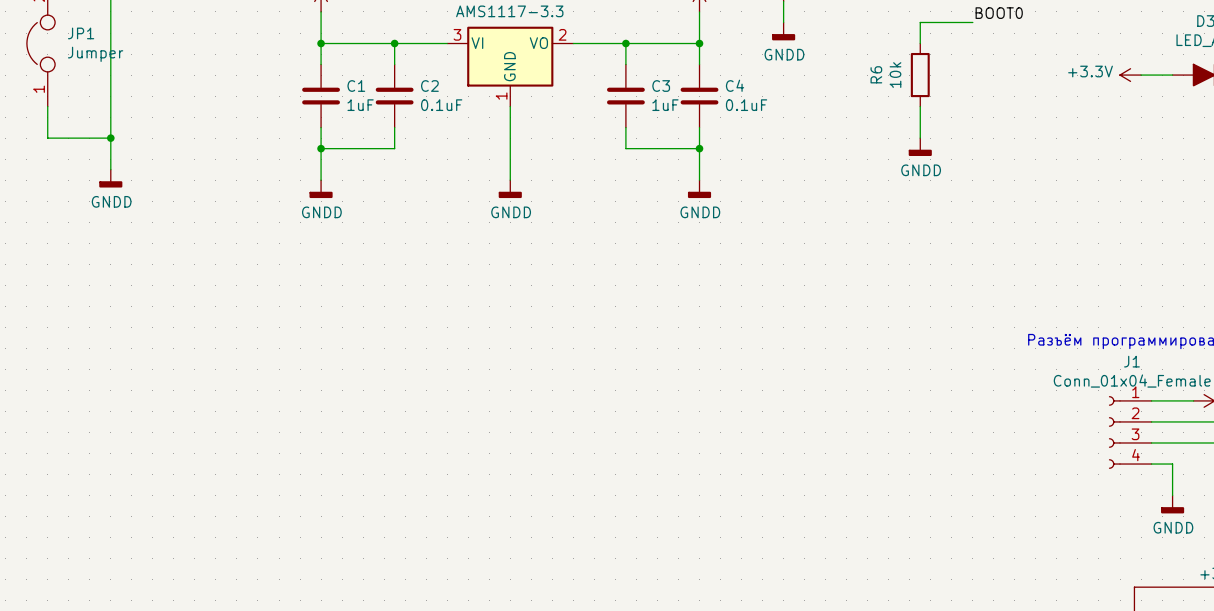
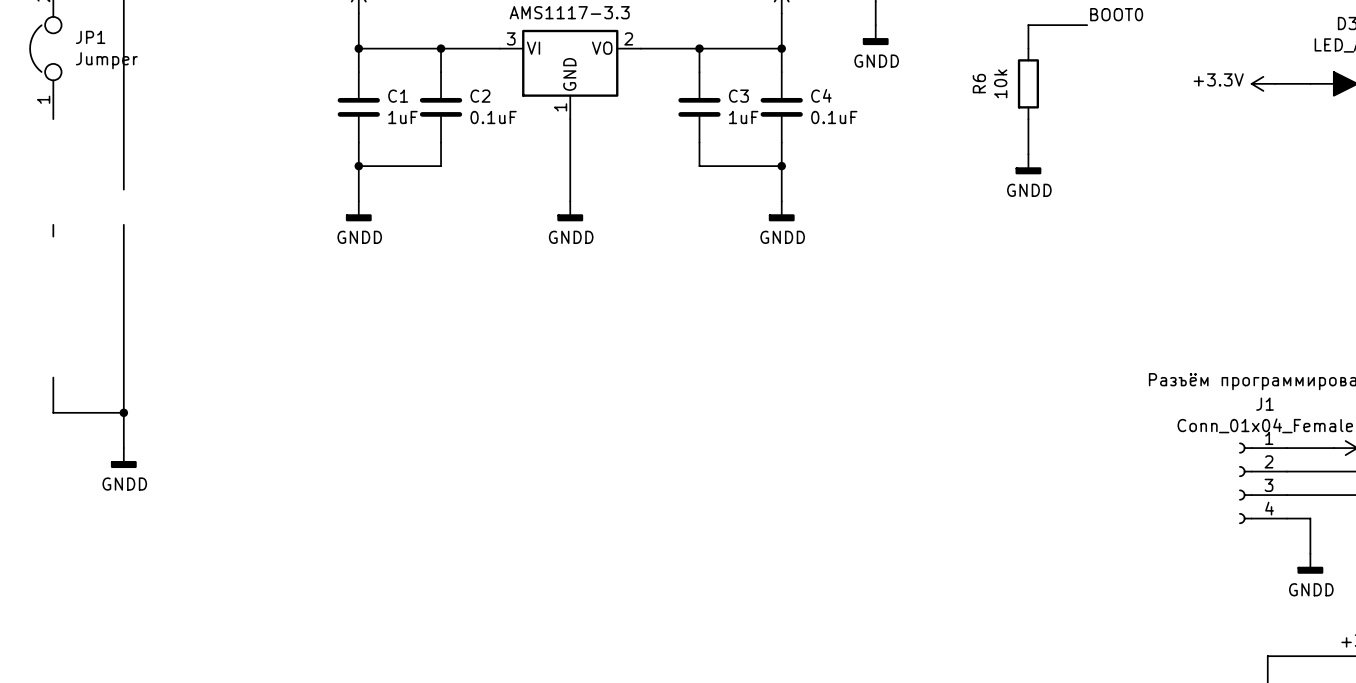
wire: (47, 106) (47, 138) (110, 138) -> none
junction: (110, 138) -> none
power symbol: GNDD (110, 178) -> none
wire: none -> (53, 224) (53, 236)
wire: none -> (123, 224) (123, 448)
wire: none -> (53, 377) (53, 412) (123, 412)
junction: none -> (123, 412)
power symbol: none -> GNDD (123, 458)

